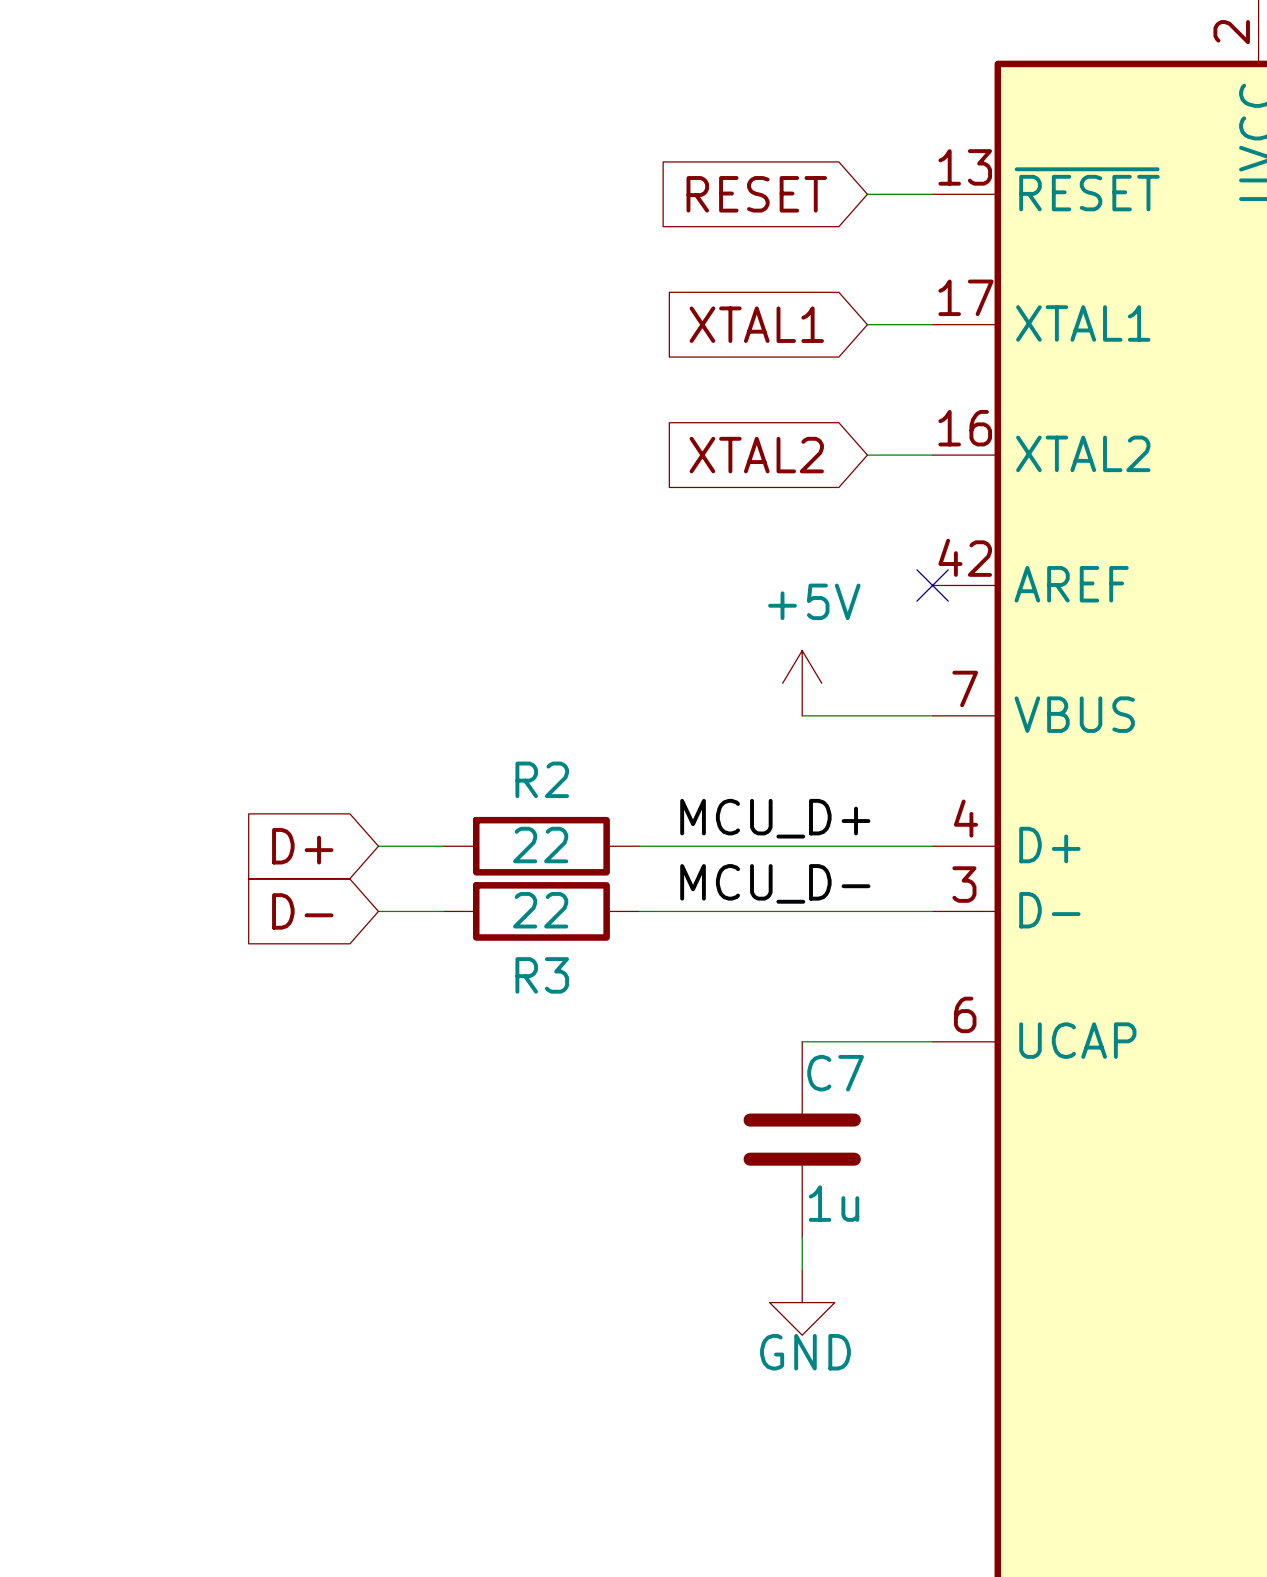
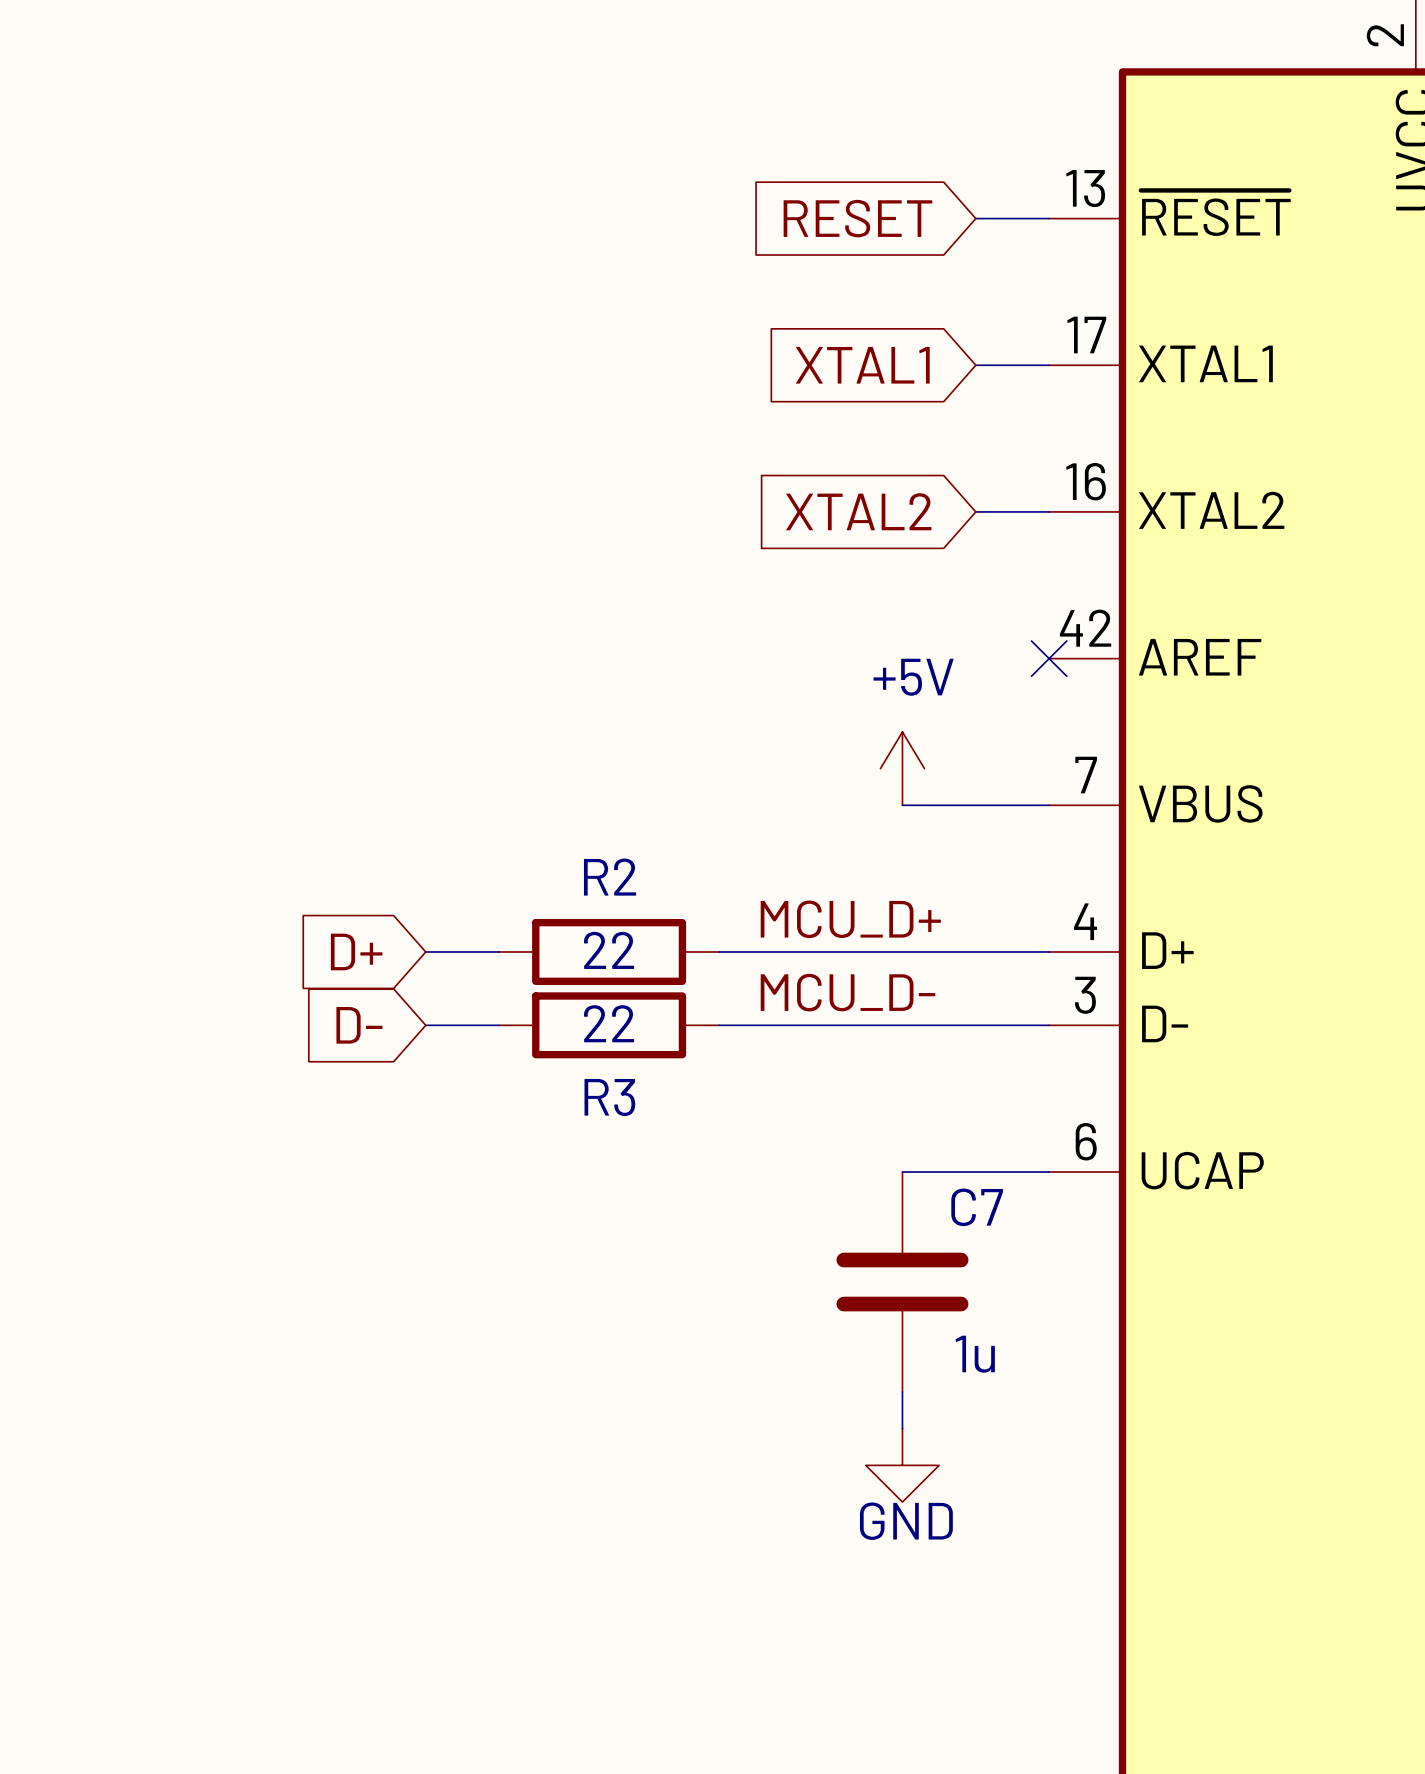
C7 name position: C7 (835, 1073) -> C7 (977, 1207)
C7 value position: 1u (834, 1203) -> 1u (975, 1354)

